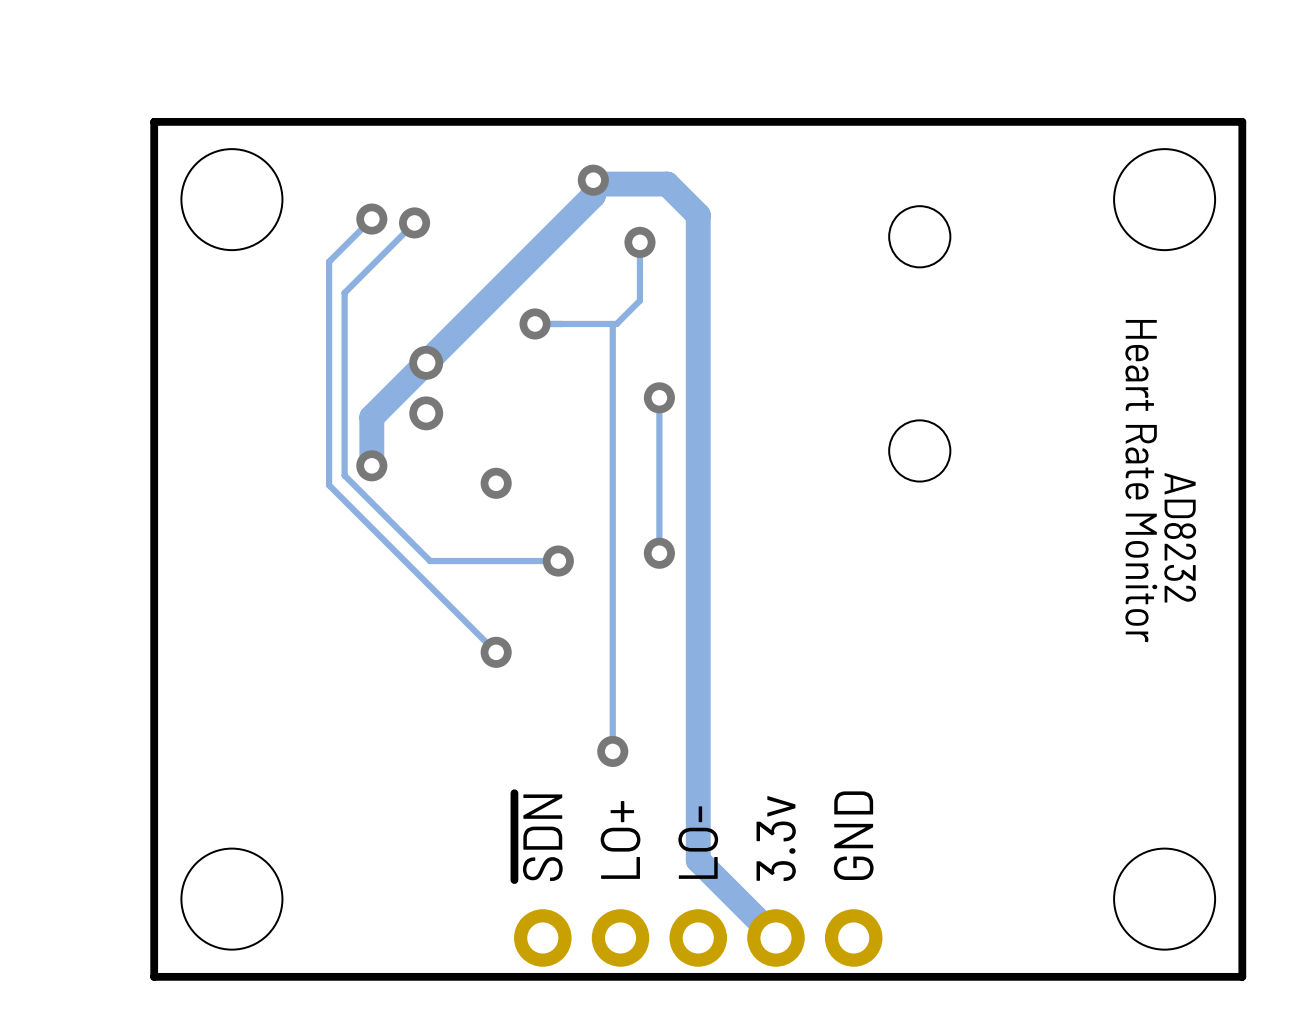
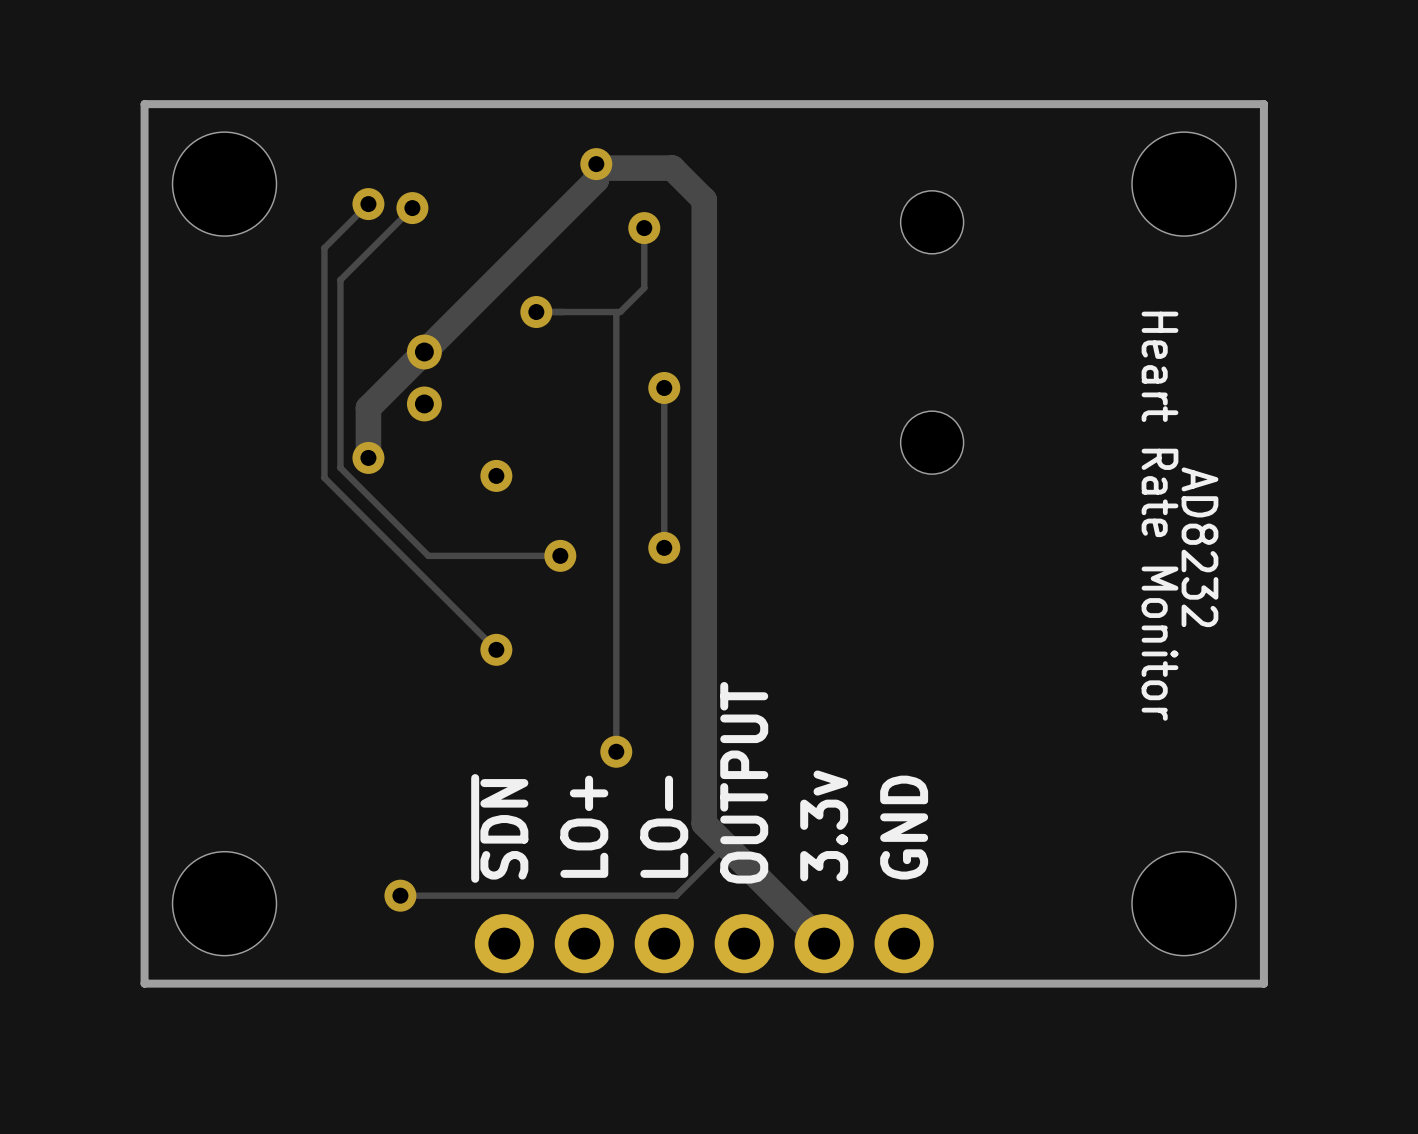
text: none -> OUTPUT (744, 782)
track: (698, 821) (698, 860) (775, 937) -> (704, 823) (824, 943)
text position: GND (853, 835) -> GND (904, 827)
text position: ~{SDN} (538, 837) -> ~{SDN} (499, 828)
text position: 3.3v (776, 838) -> 3.3v (824, 825)
text position: LO+ (620, 839) -> LO+ (584, 826)
text position: LO- (698, 842) -> LO- (664, 826)
track: none -> (726, 845) (676, 895) (400, 895)
via: none -> (400, 895)
part footprint: [514, 909, 883, 967] -> [474, 914, 934, 974]

